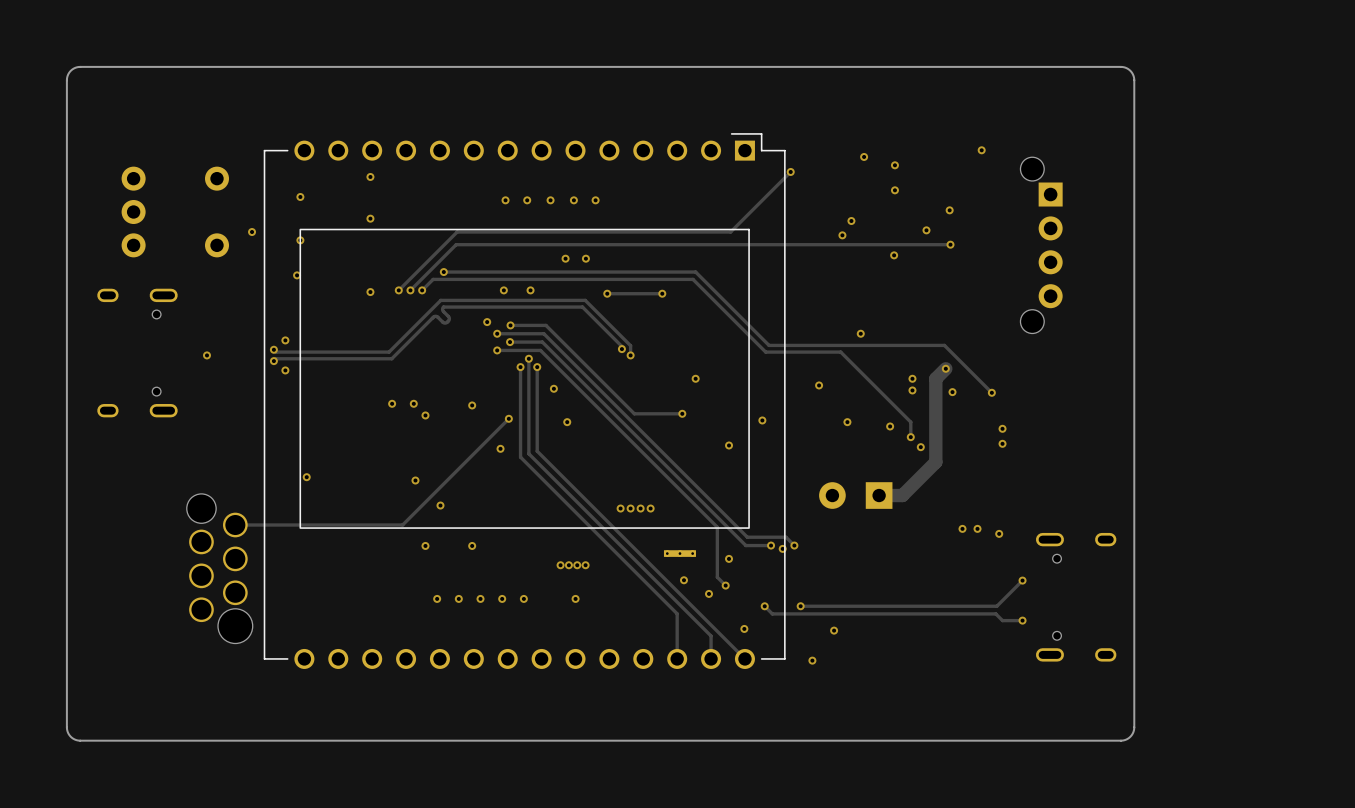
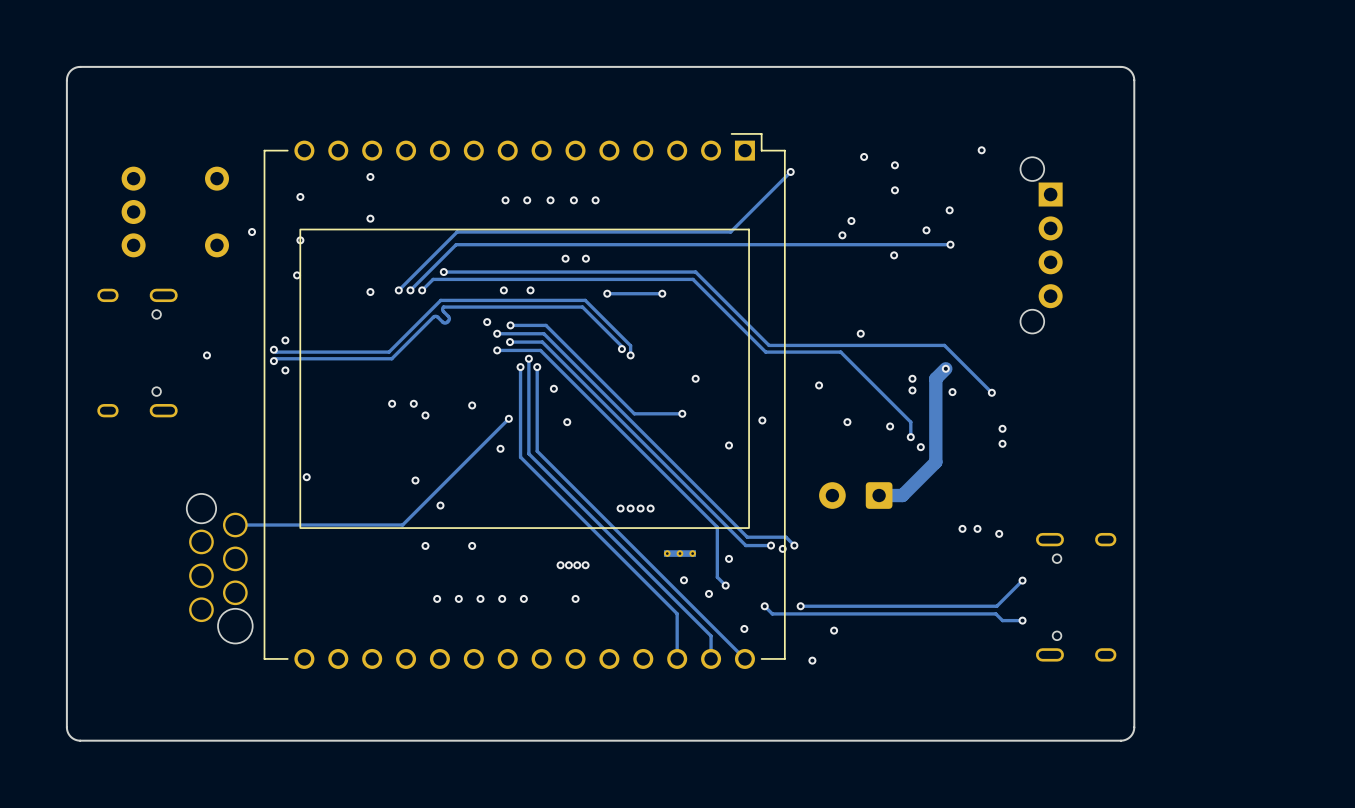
part footprint: [819, 482, 893, 509] -> [819, 482, 893, 509]

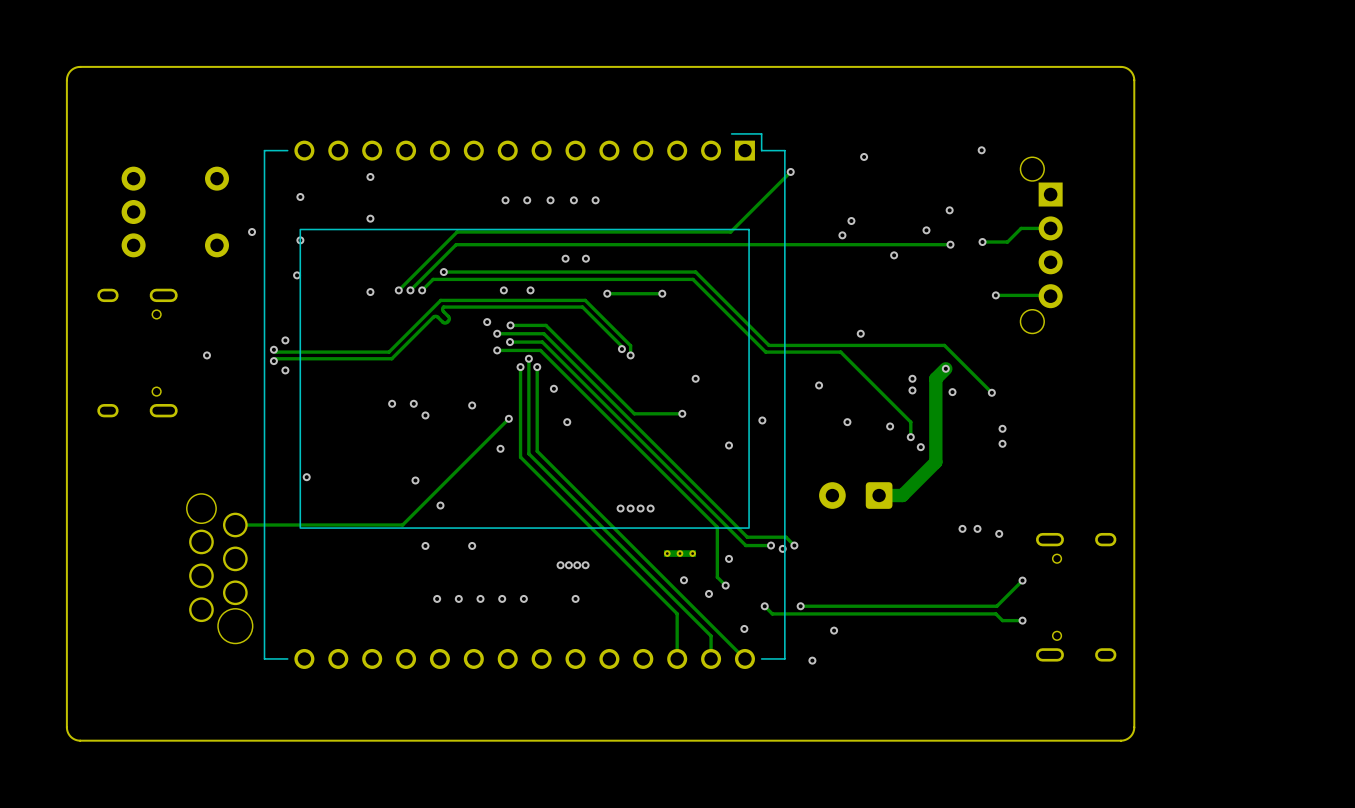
via: (894, 165) -> none
via: (894, 190) -> none
track: none -> (1050, 228) (1021, 228) (1007, 242) (982, 242)
via: none -> (982, 242)
track: none -> (995, 295) (1050, 296)
via: none -> (995, 295)

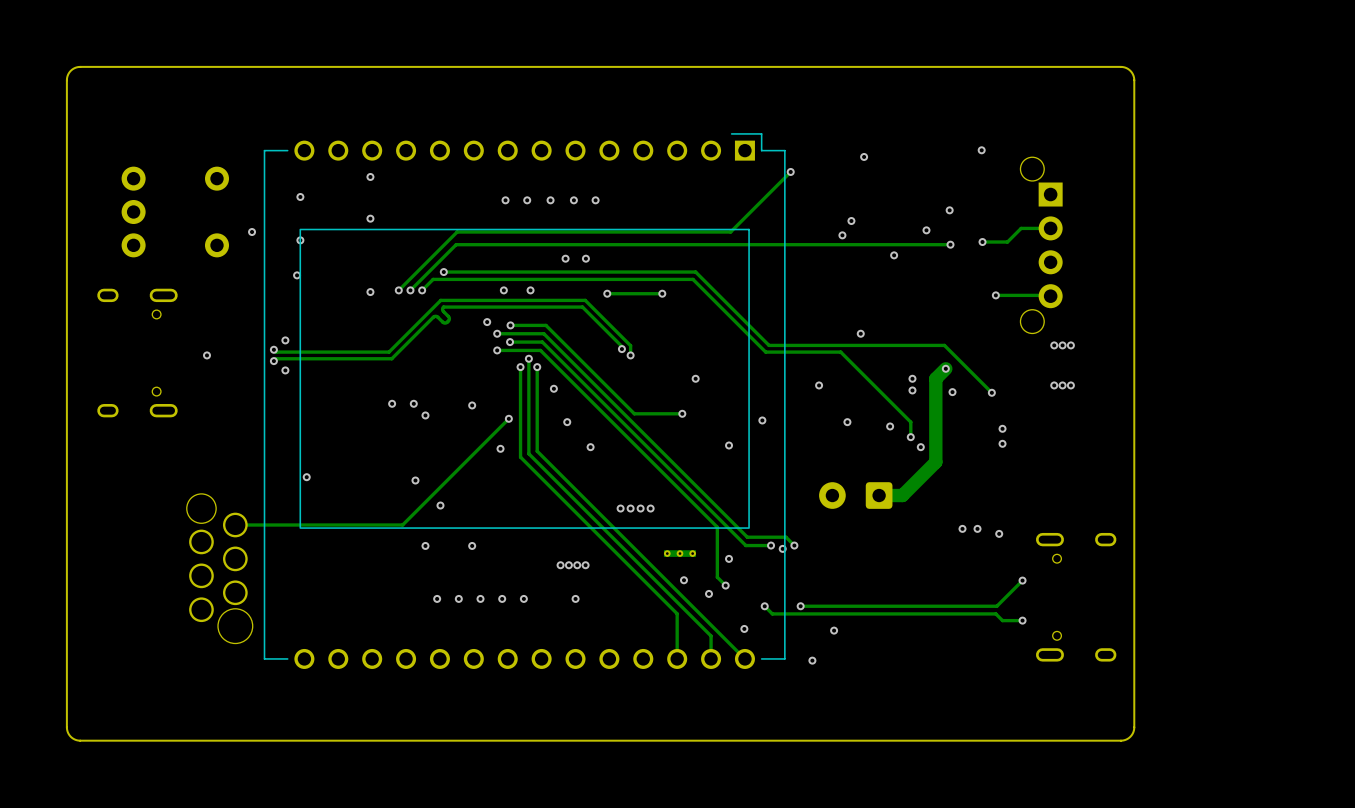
via: none -> (1054, 345)
via: none -> (1062, 345)
via: none -> (1070, 345)
via: none -> (1054, 385)
via: none -> (1062, 385)
via: none -> (1070, 385)
via: none -> (590, 447)

